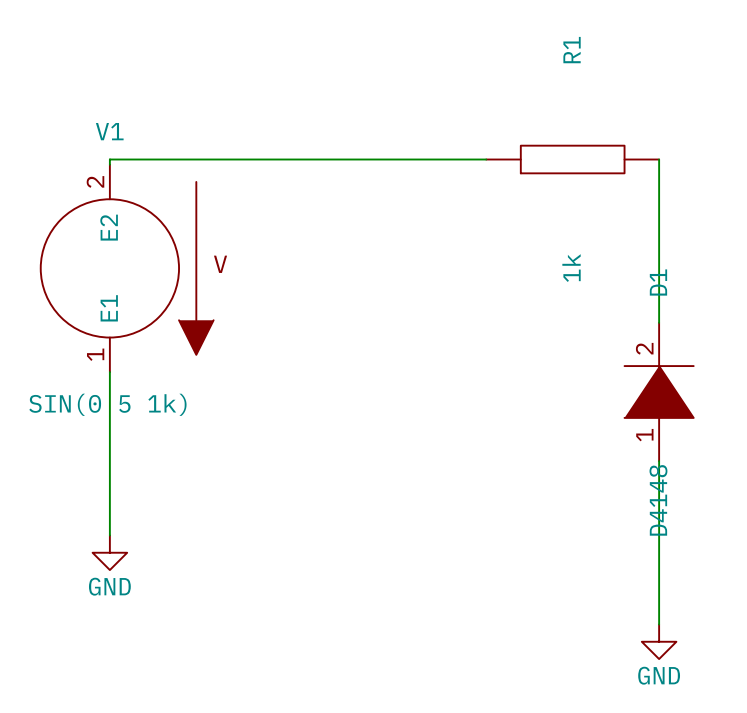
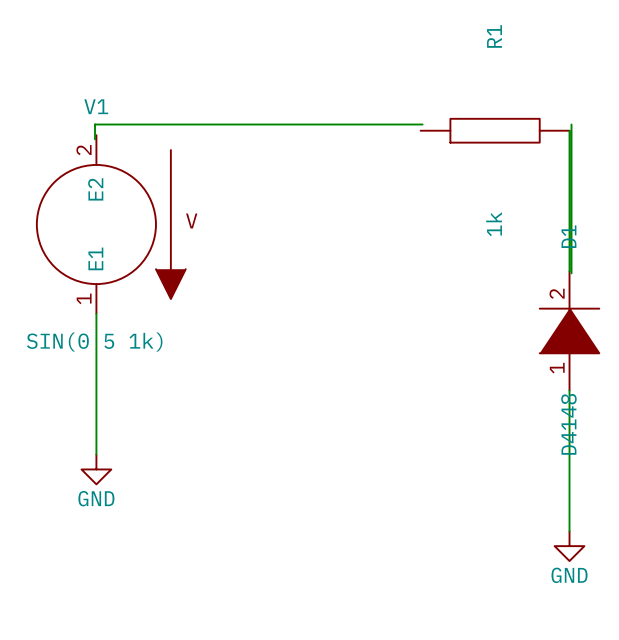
wire: none -> (422, 124) (95, 124) (95, 139)
wire: none -> (571, 124) (571, 273)
wire: (486, 159) (109, 159) (109, 164) -> none

